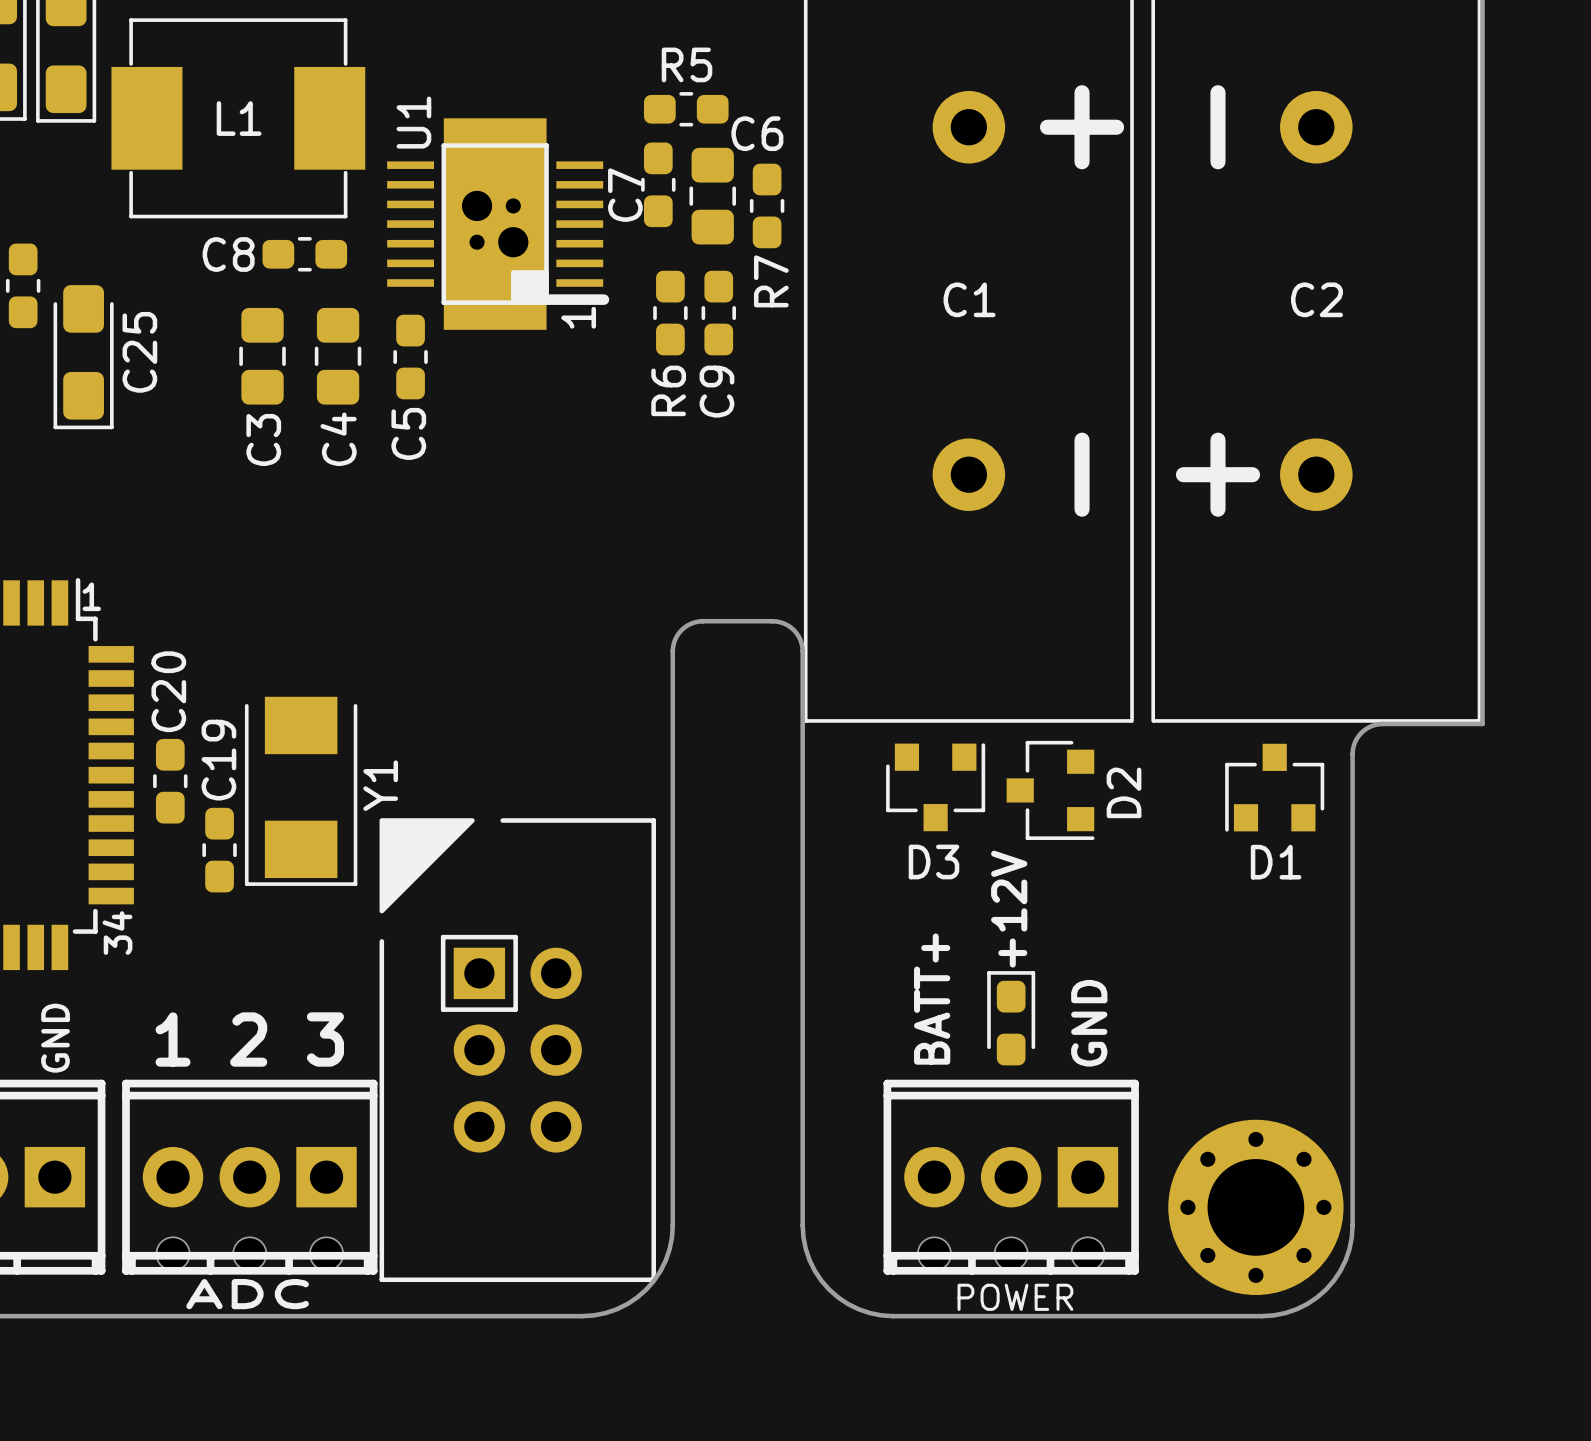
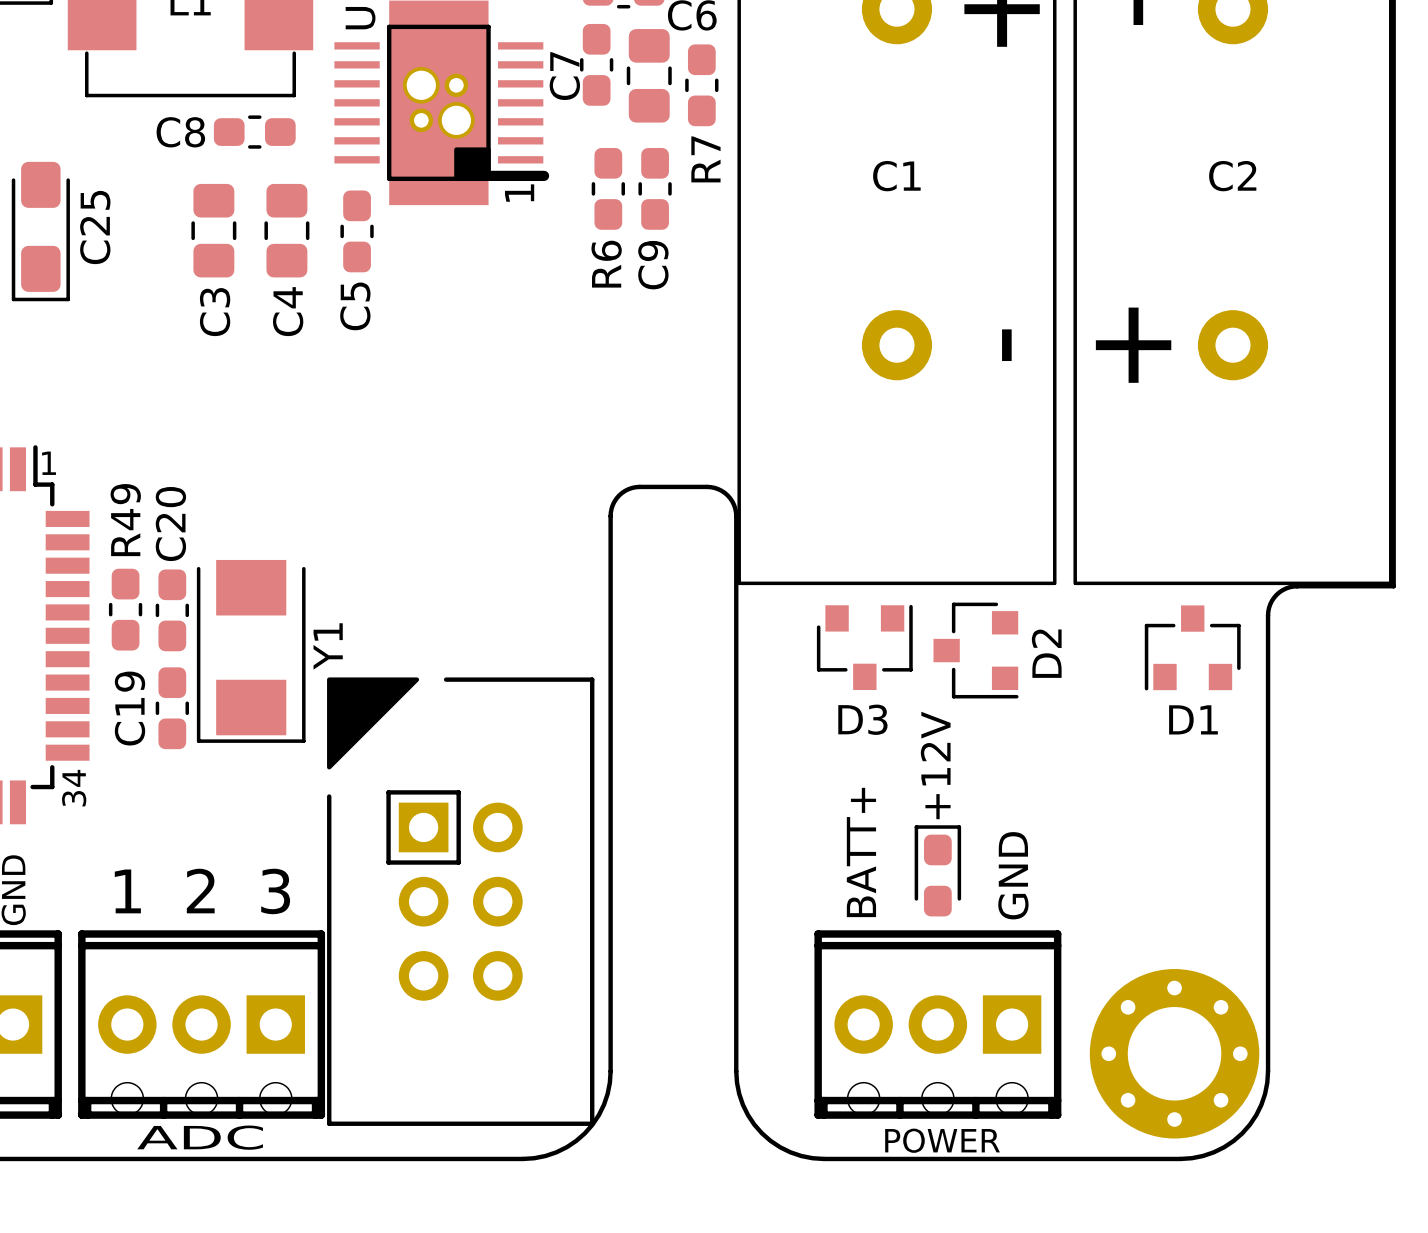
R49: none -> (125, 609)
C19 name position: C19 (218, 760) -> C19 (129, 708)
C20 position: (170, 781) -> (172, 610)

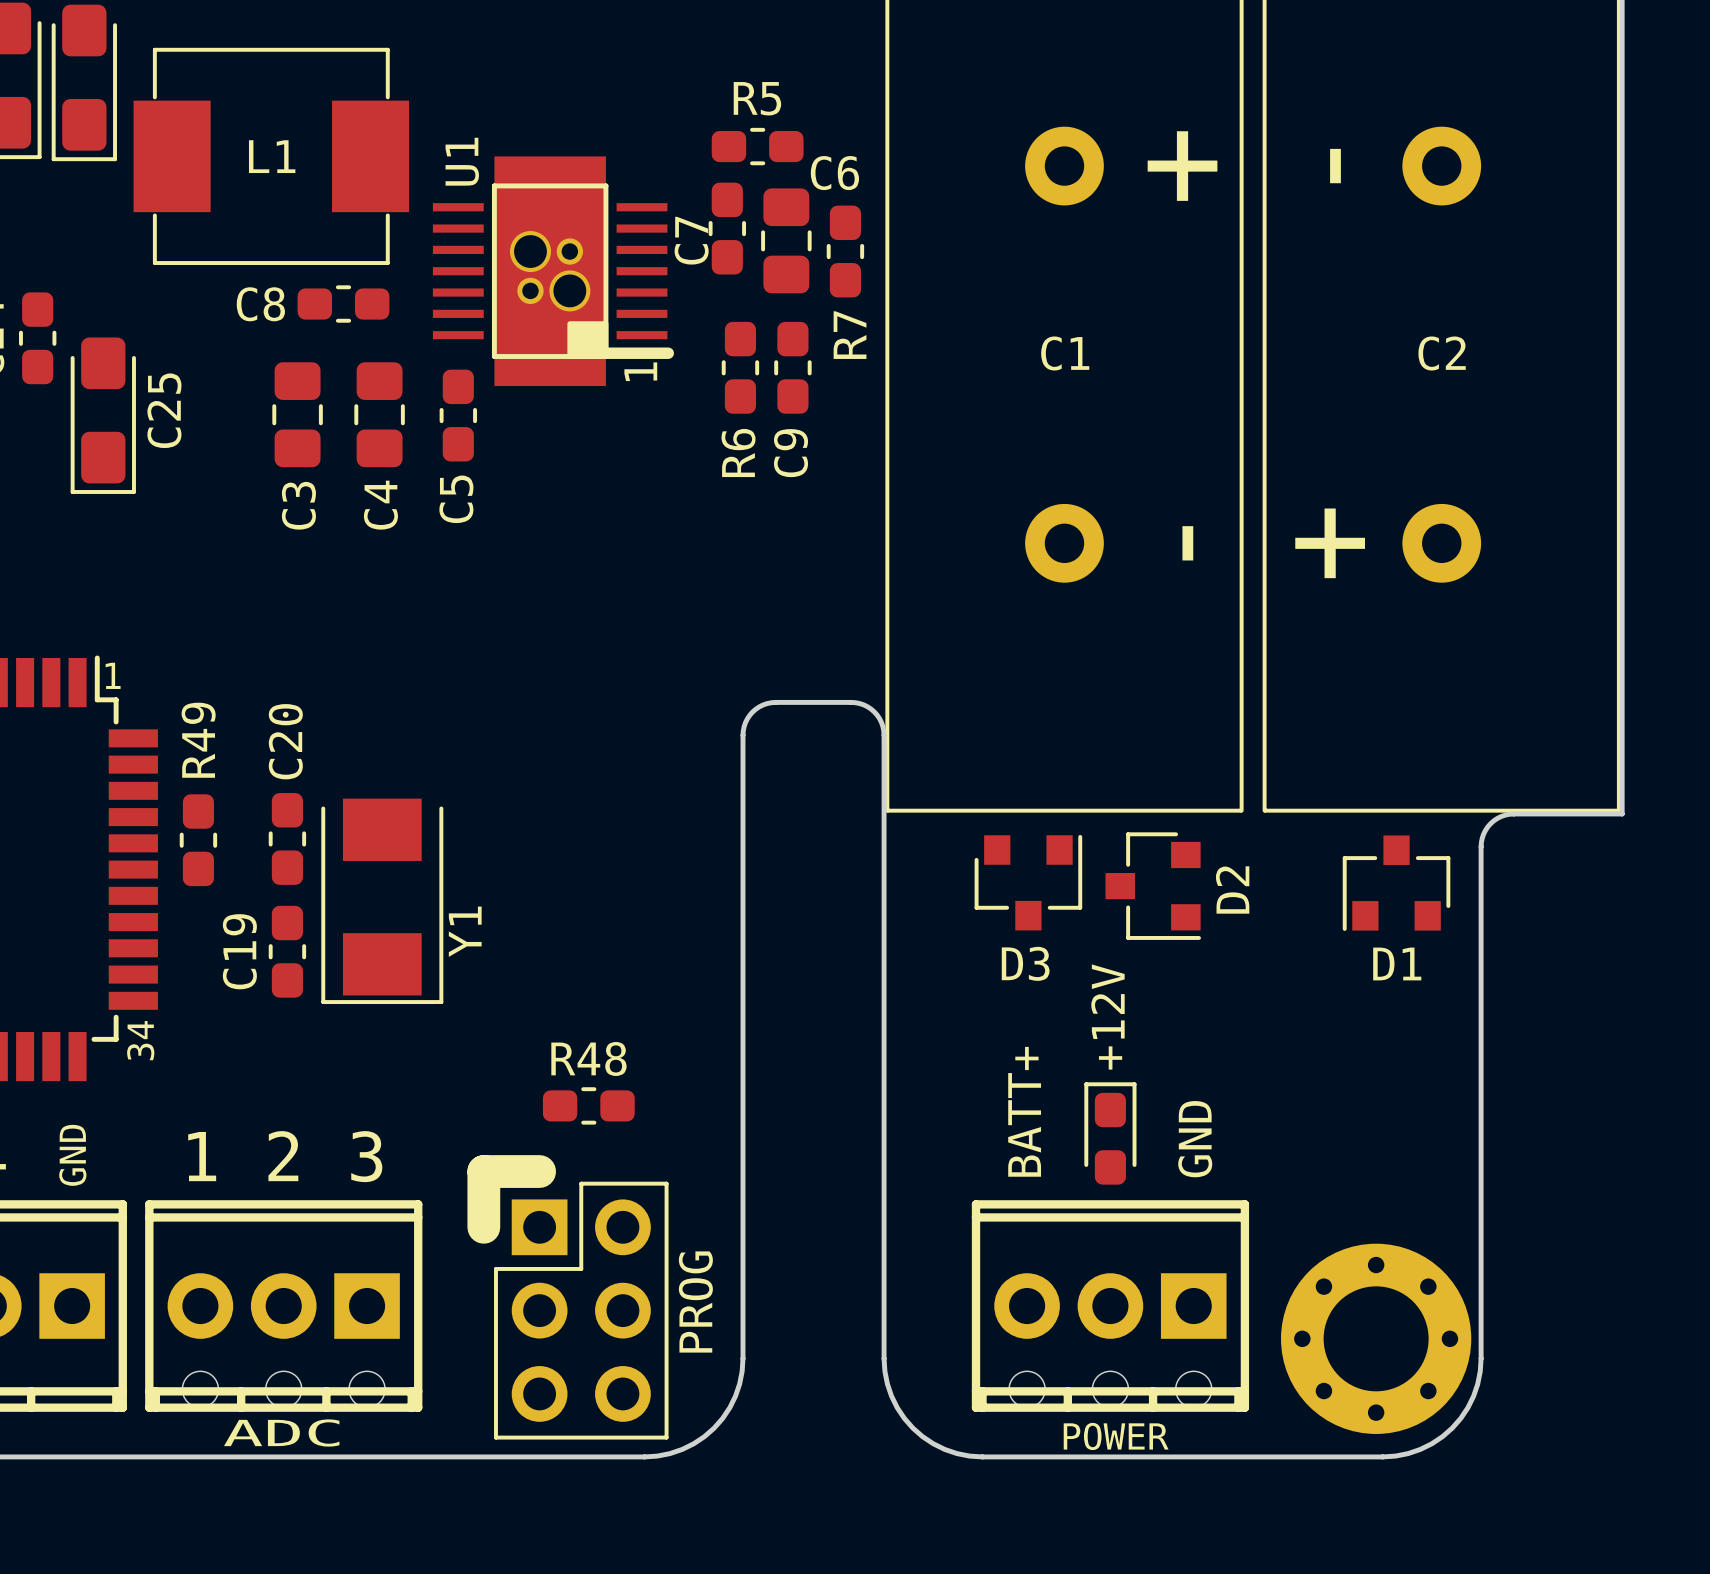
C20 position: (172, 610) -> (287, 838)
Y1 name position: Y1 (328, 646) -> Y1 (465, 931)
Y1 position: (251, 651) -> (382, 901)
C19 position: (172, 708) -> (287, 951)
R48: none -> (588, 1105)
part: (460, 901) -> none
part: none -> PROG (567, 1297)

